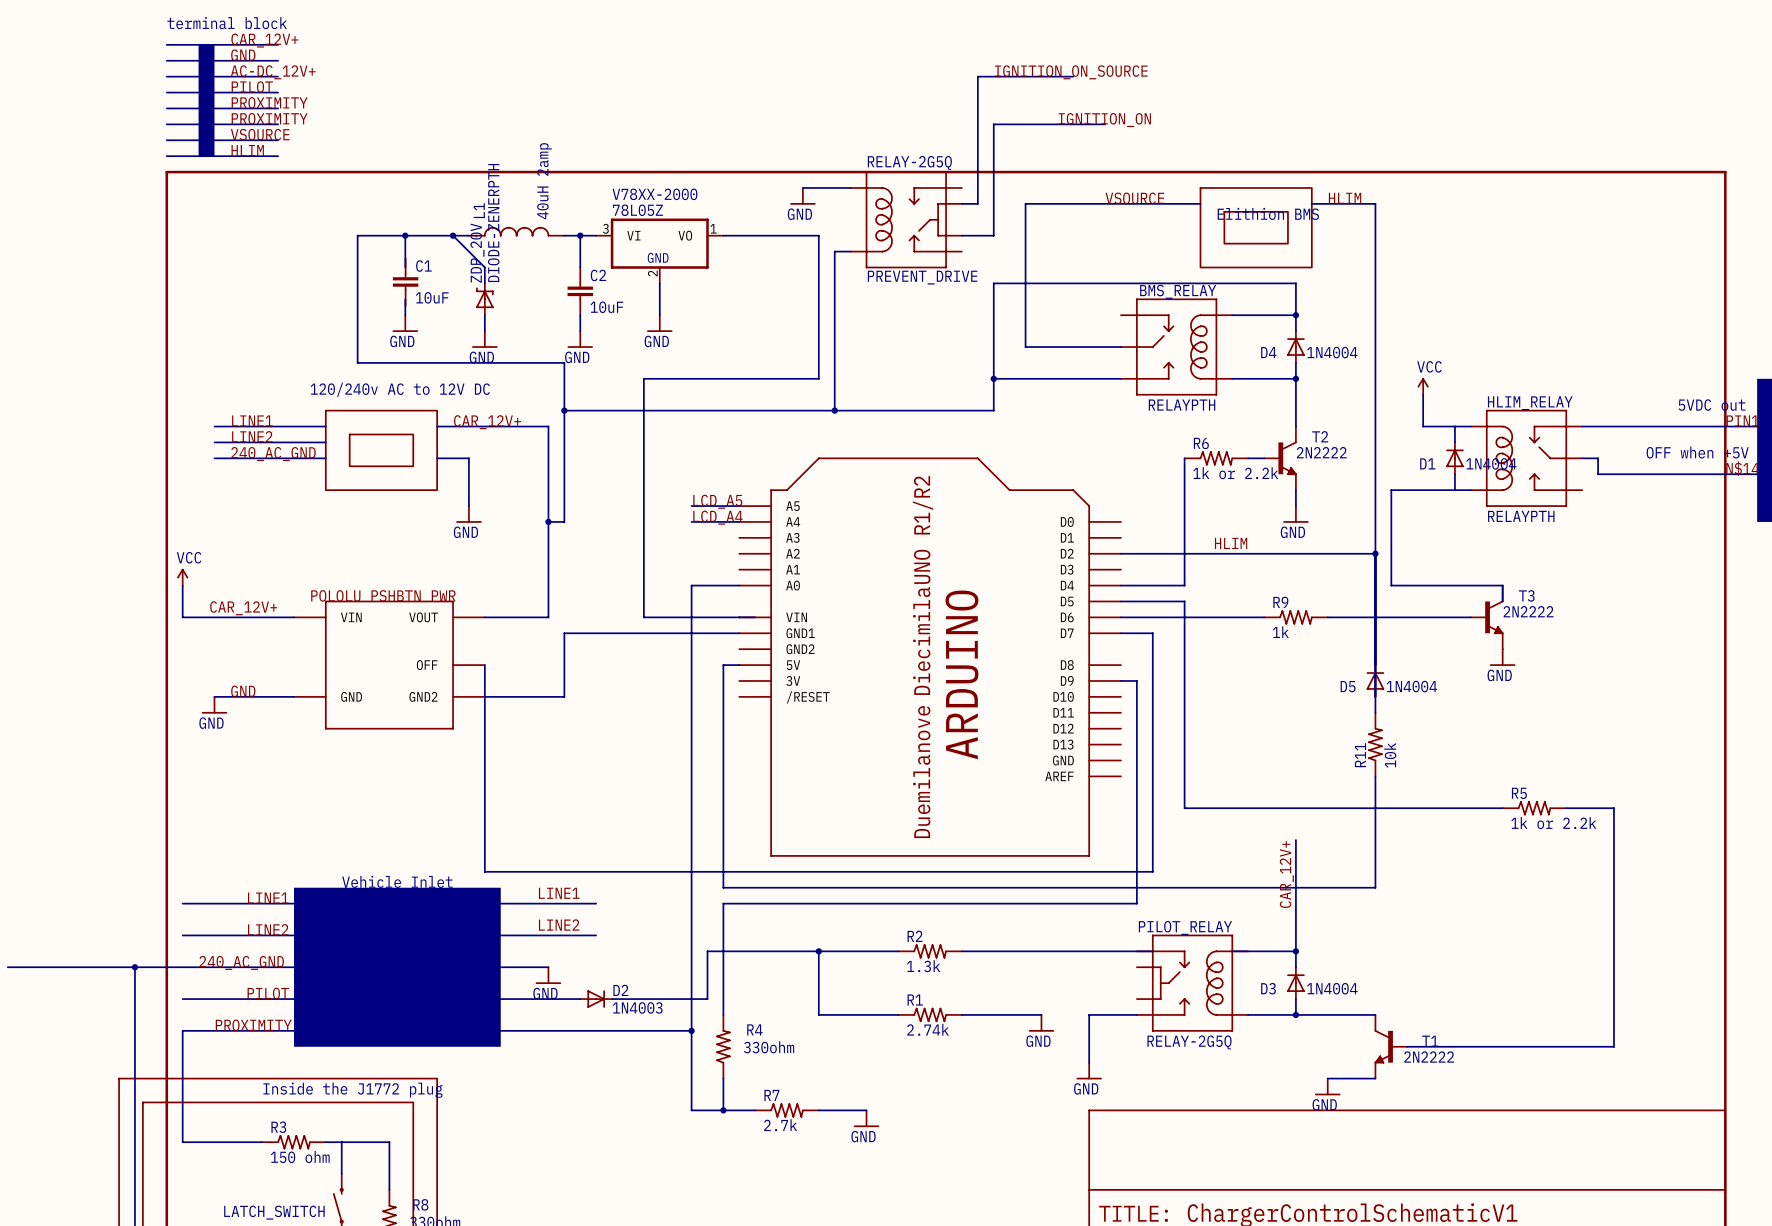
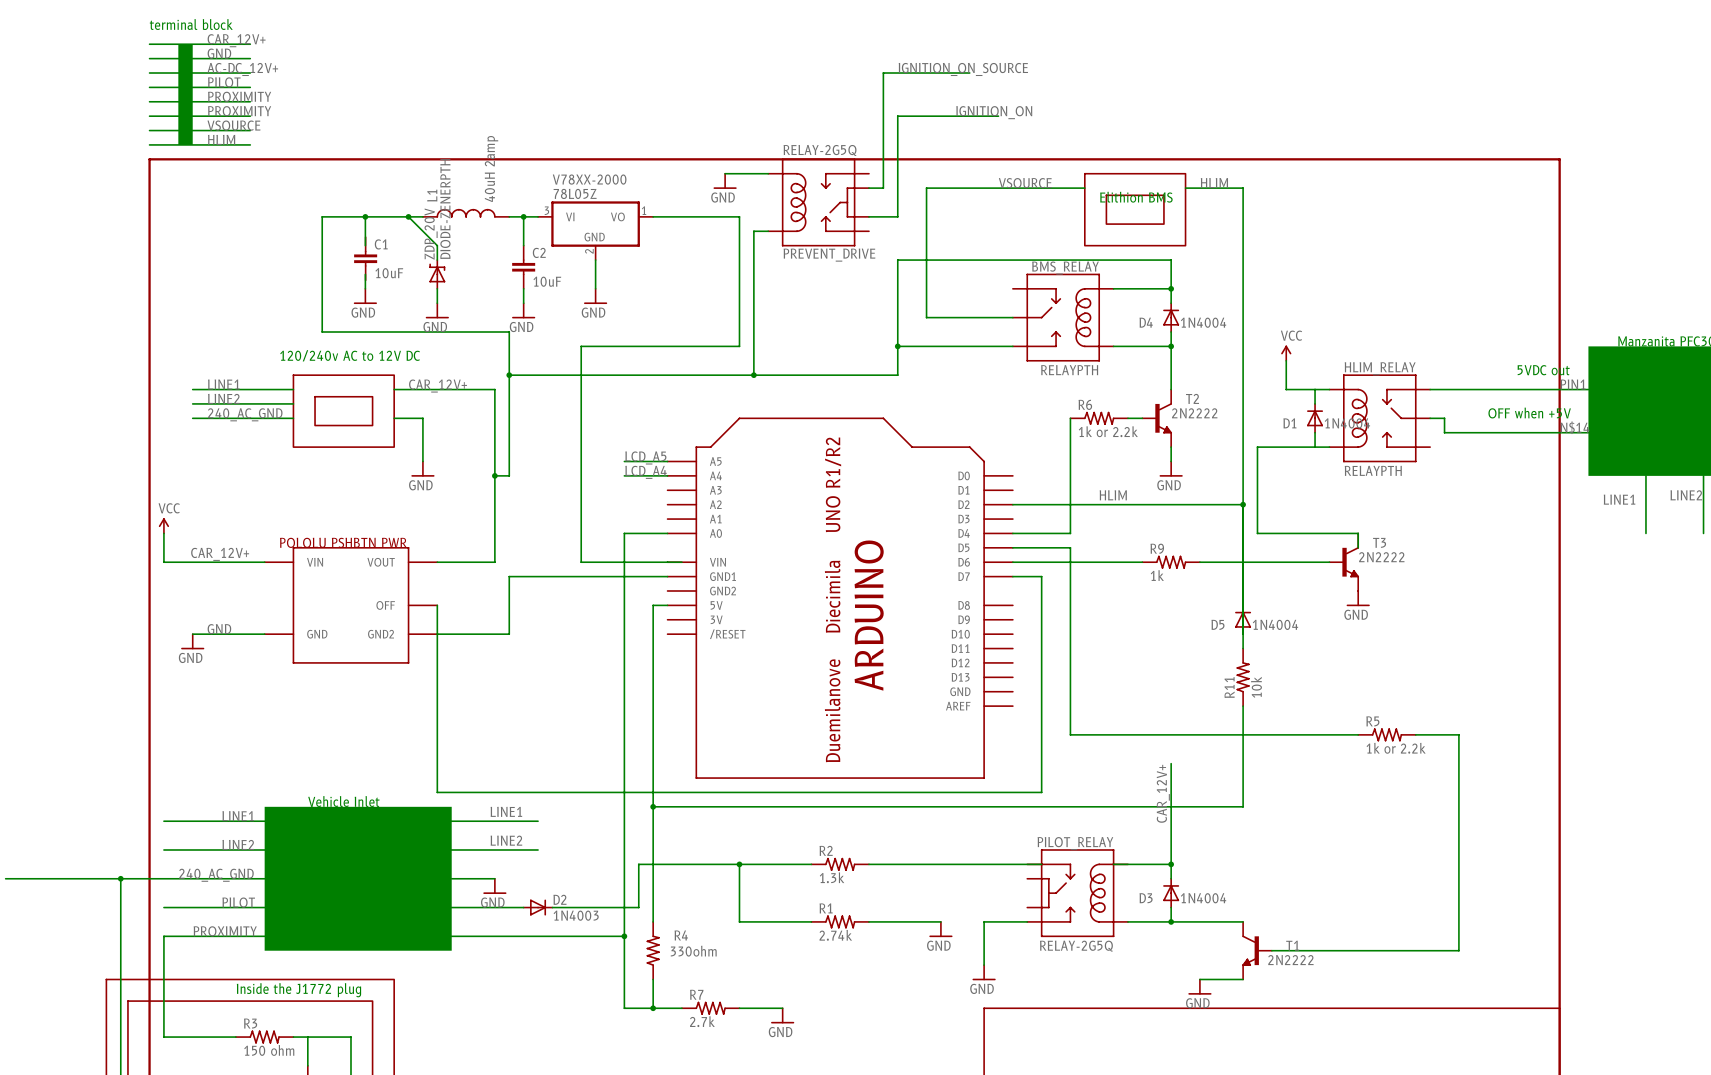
wire: (1120, 680) (1136, 680) (1136, 903) (723, 903) -> (653, 806) (653, 821)
junction: none -> (653, 806)

